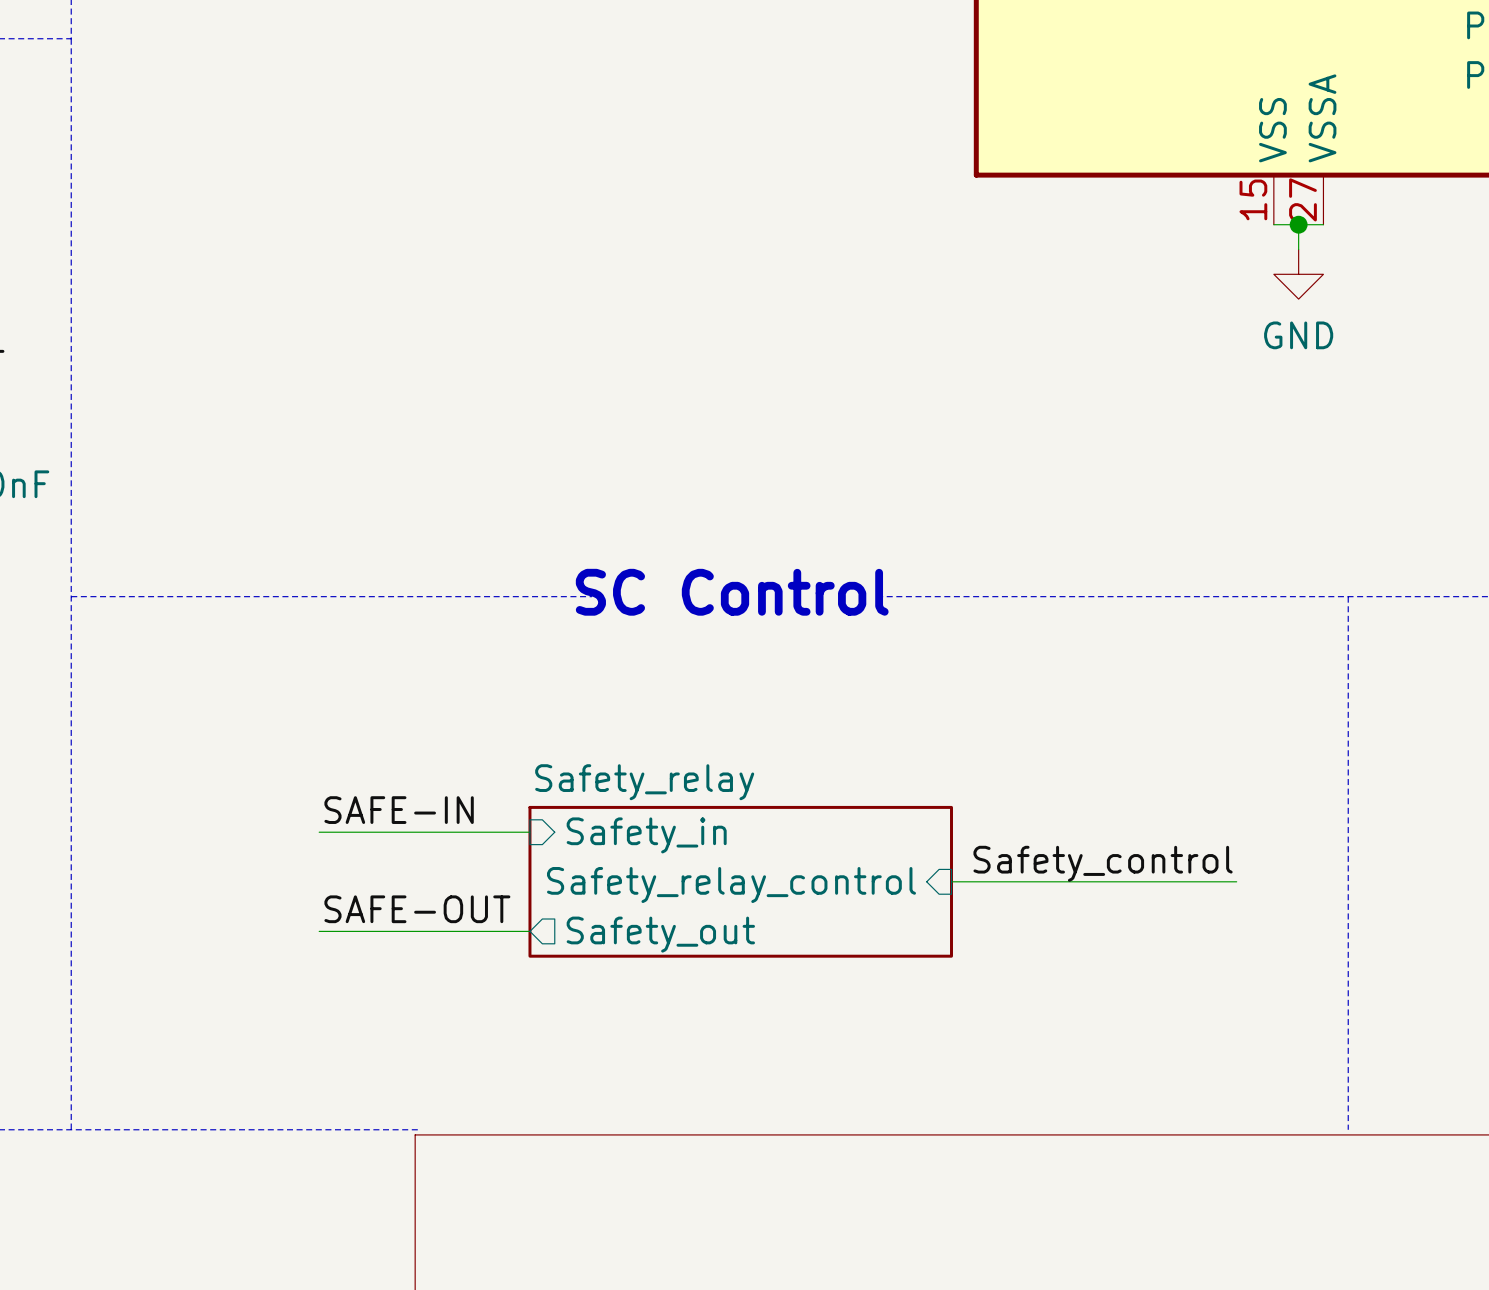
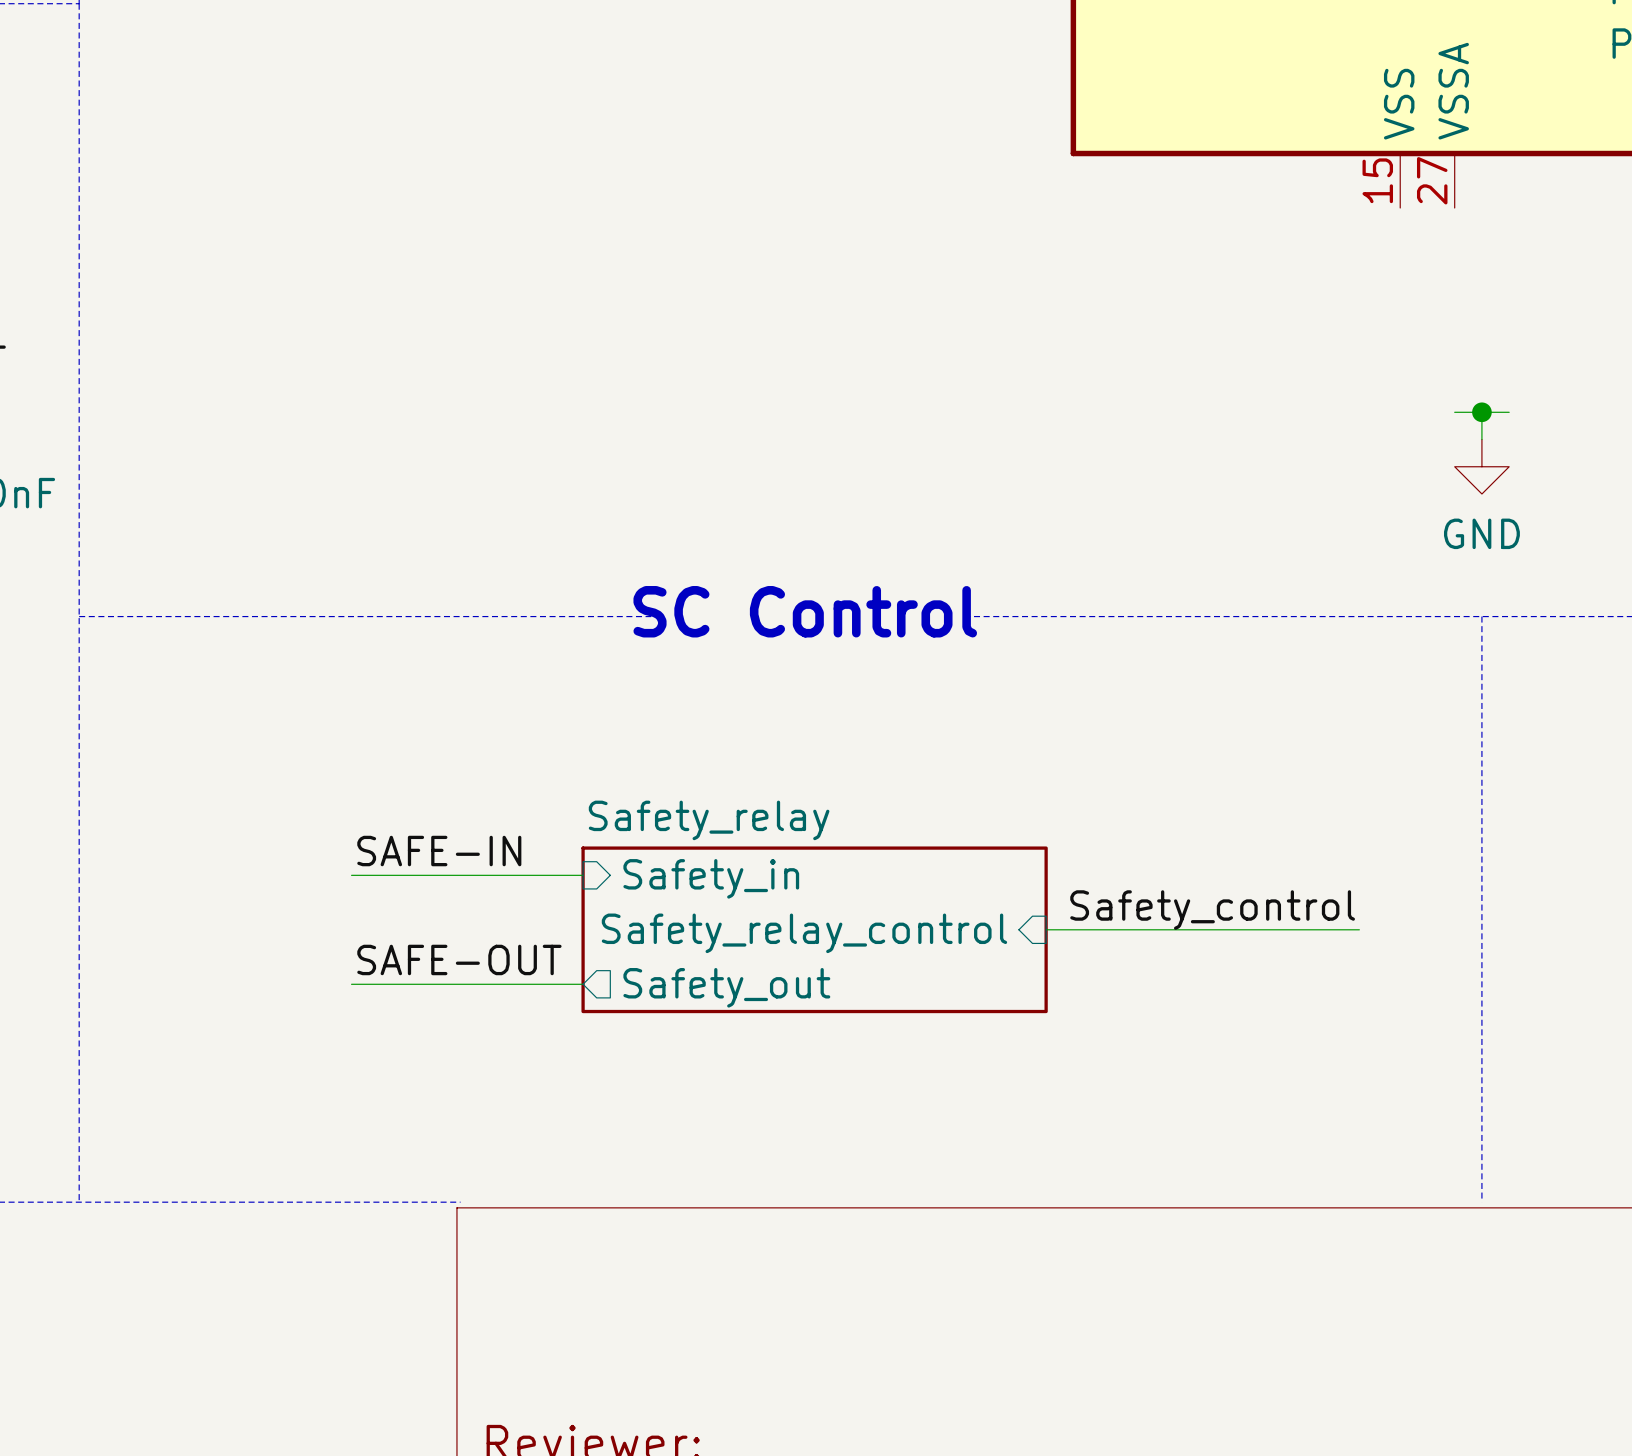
wire: (1273, 224) (1323, 224) -> (1454, 412) (1509, 412)
wire: (1298, 224) (1298, 249) -> (1481, 412) (1481, 439)
junction: (1298, 224) -> none
power symbol position: GND (1298, 274) -> GND (1481, 466)
junction: none -> (1481, 412)

